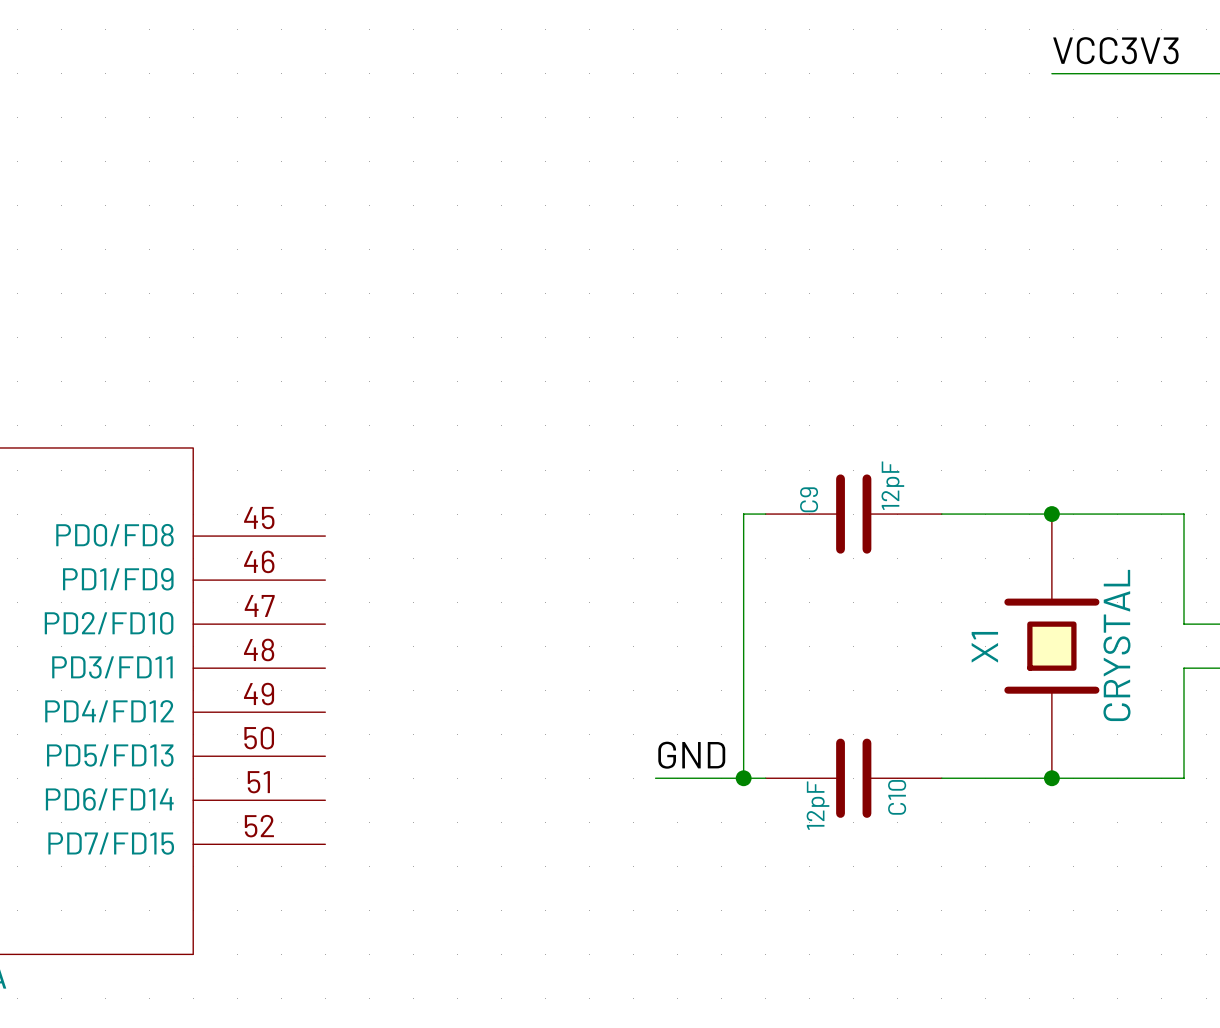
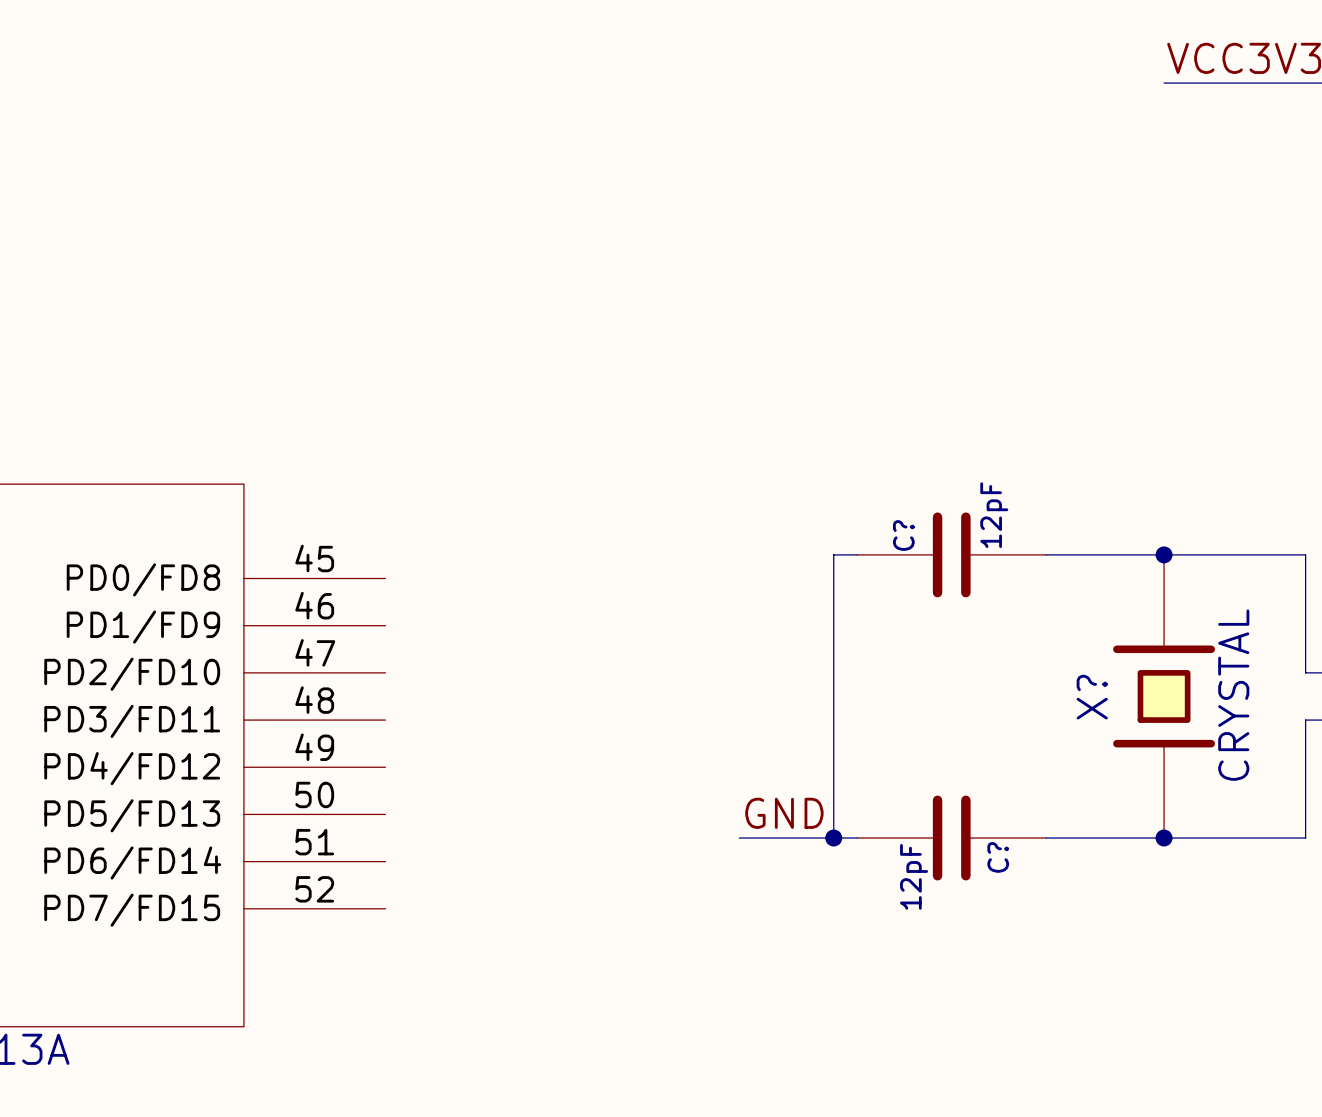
C9 name: C9 (809, 499) -> C? (903, 535)
X1 name: X1 (984, 647) -> X? (1092, 697)
C10 name: C10 (897, 797) -> C? (998, 857)

